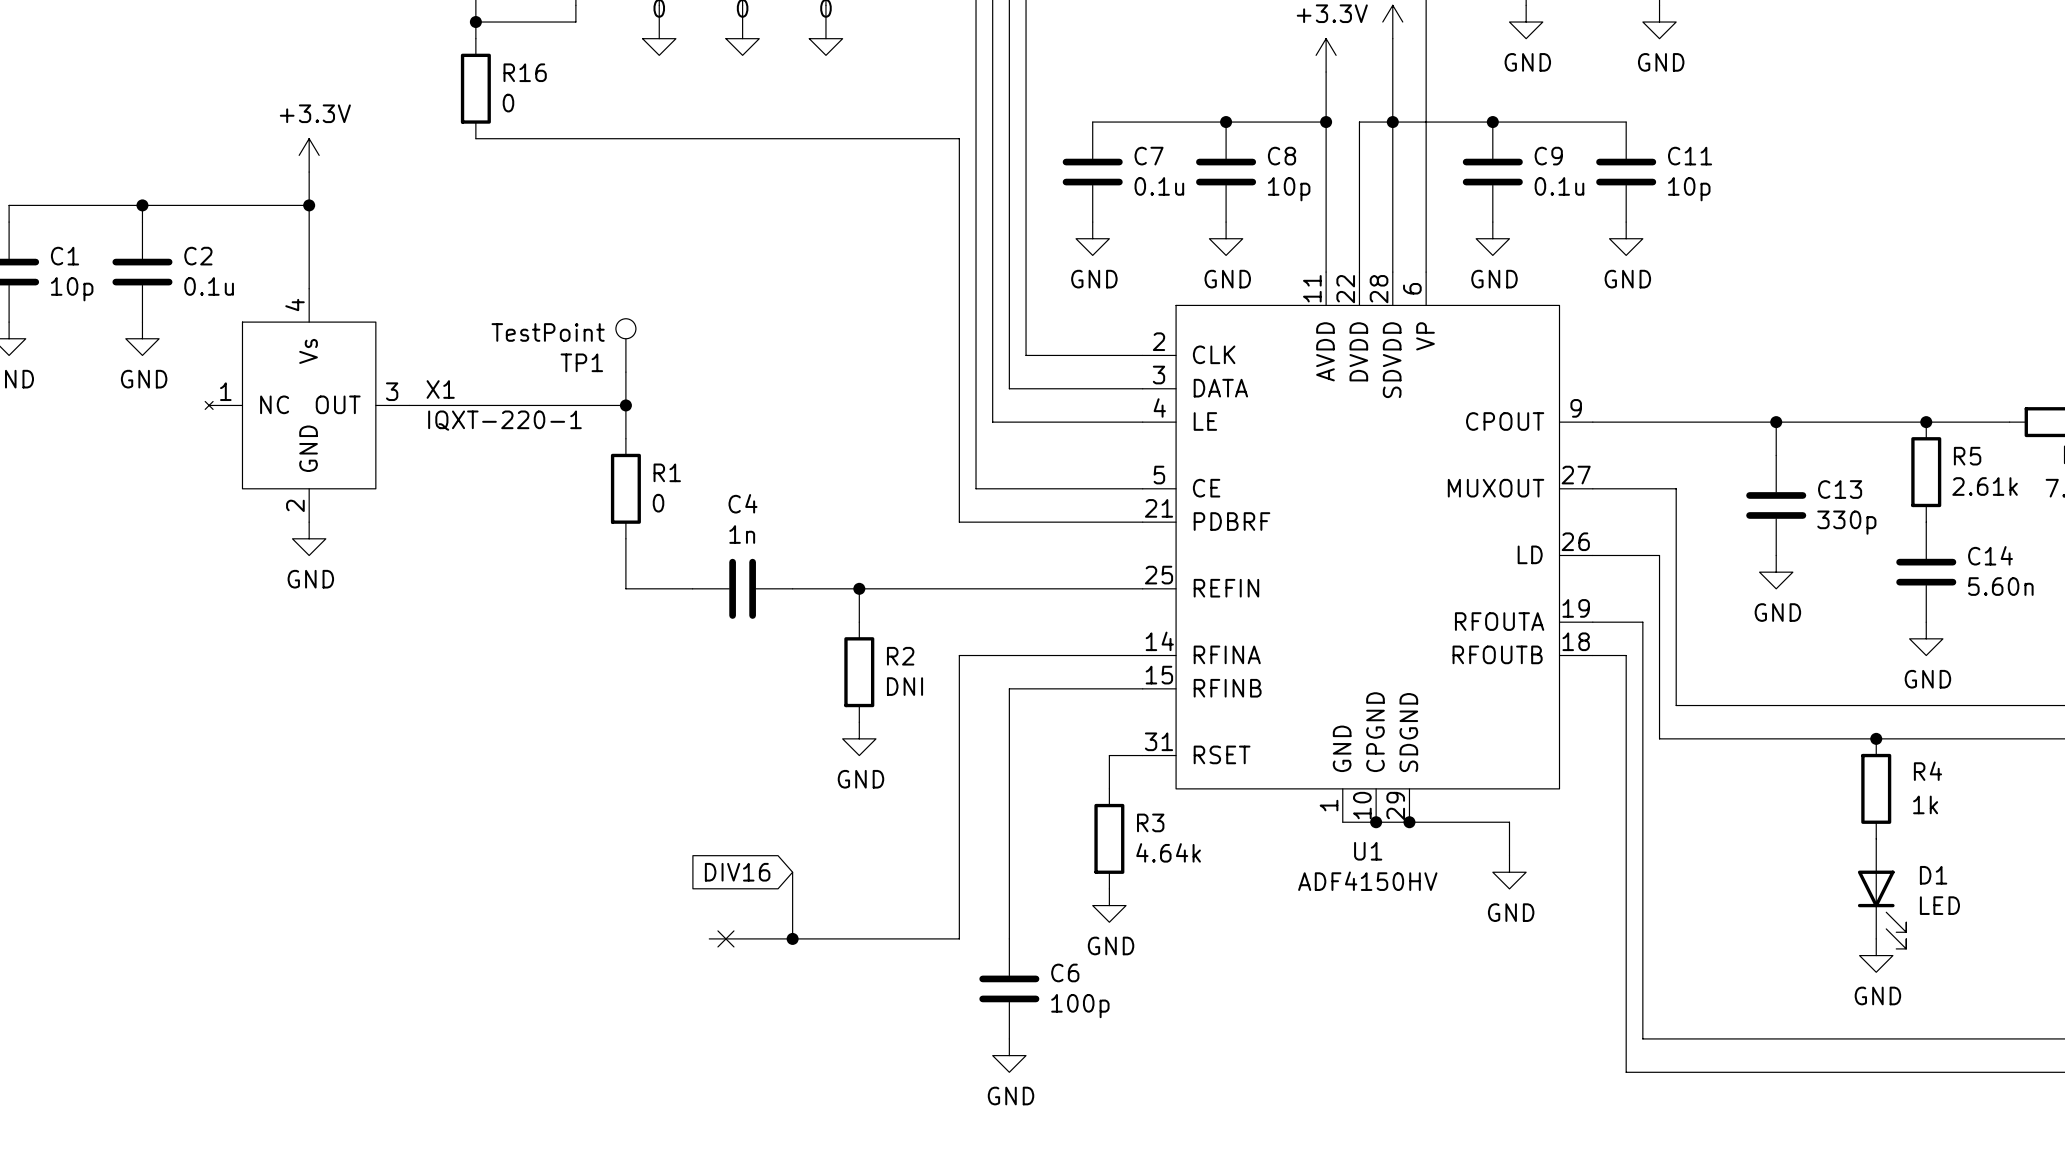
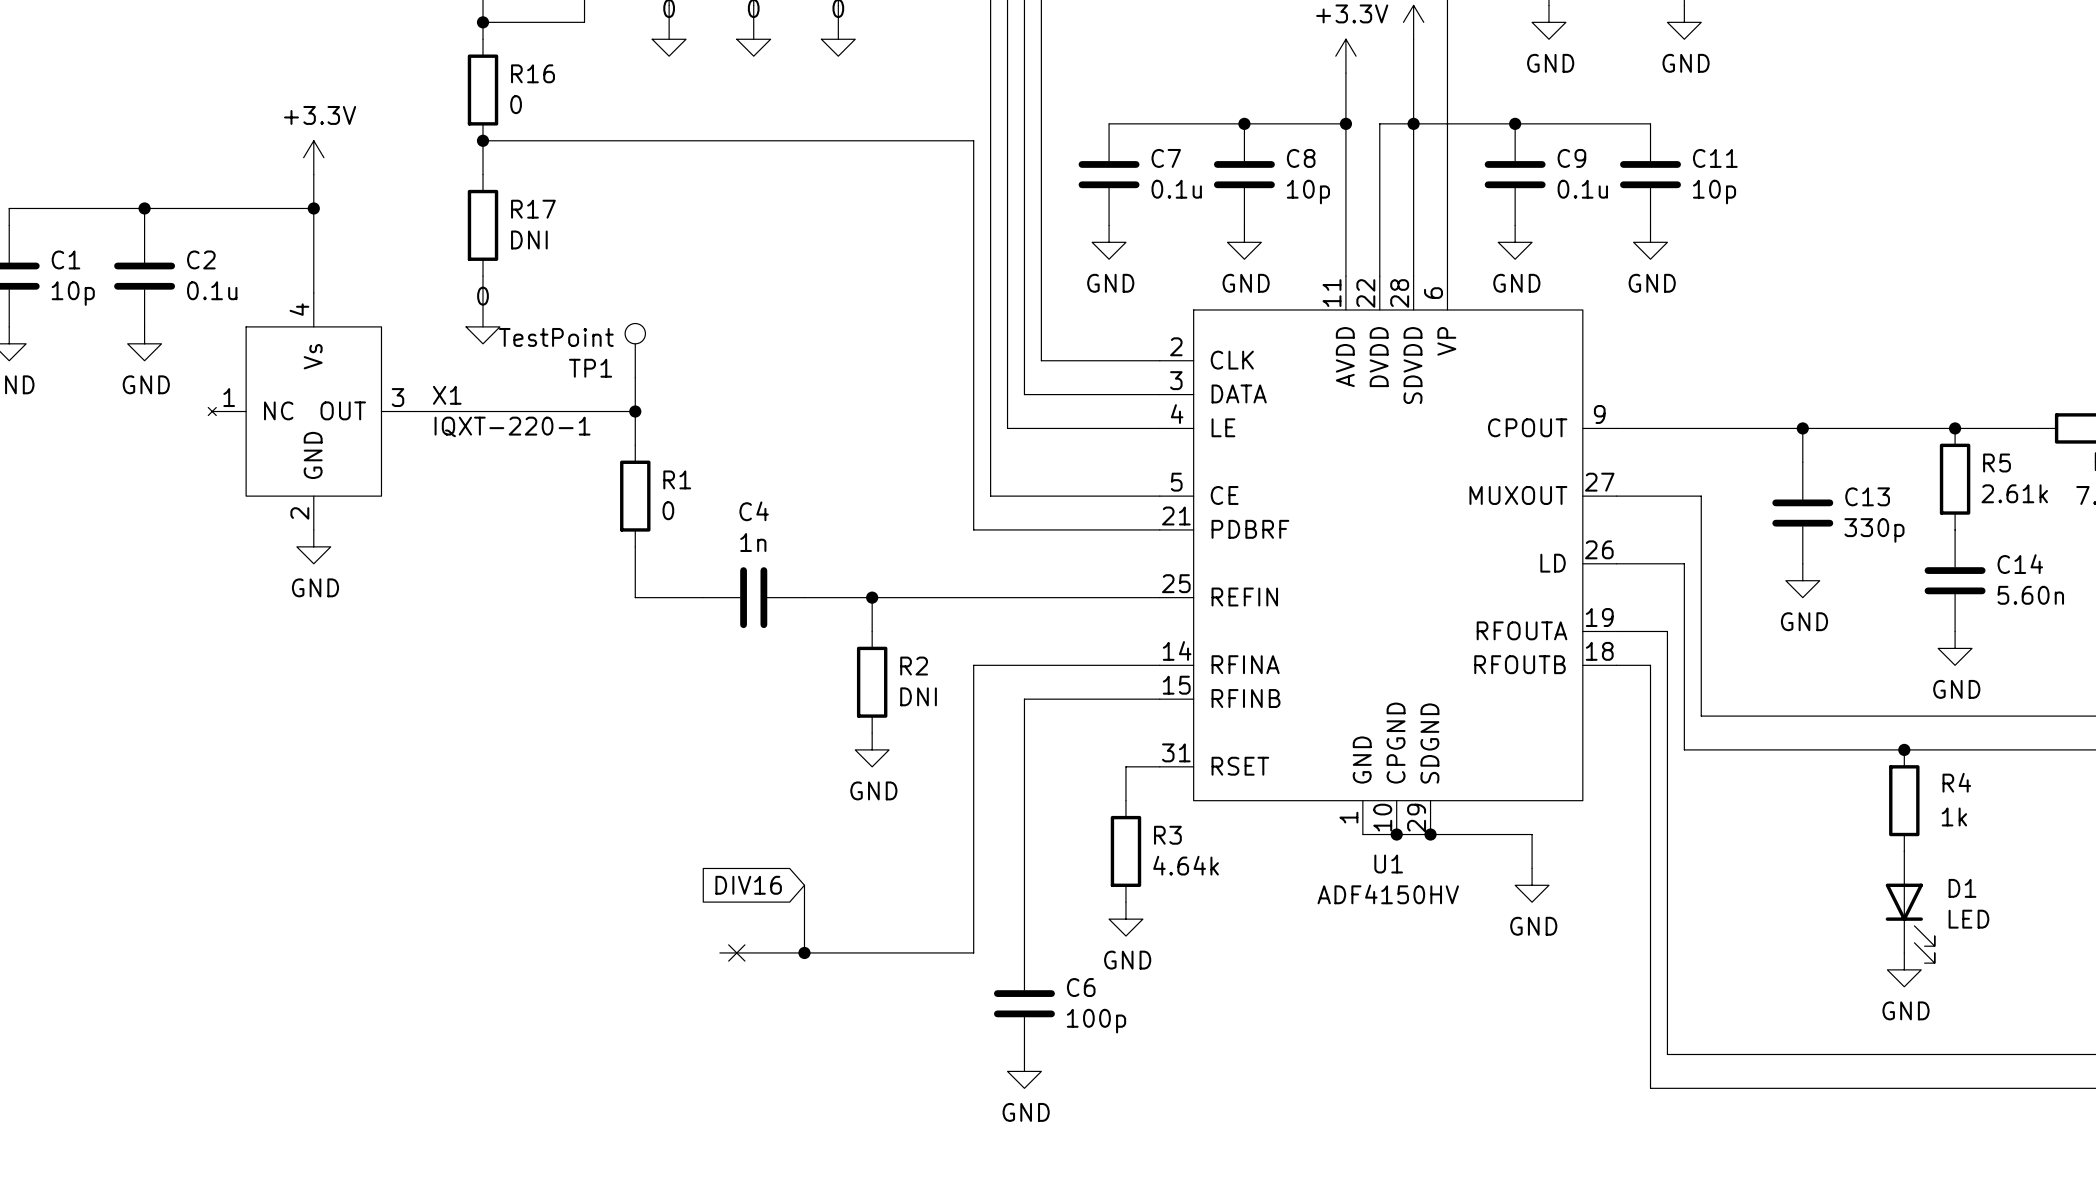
wire: none -> (483, 140) (483, 174)
junction: none -> (483, 140)
R17: none -> DNI (483, 225)
wire: none -> (483, 276) (483, 326)
power symbol: none -> 0 (483, 335)

